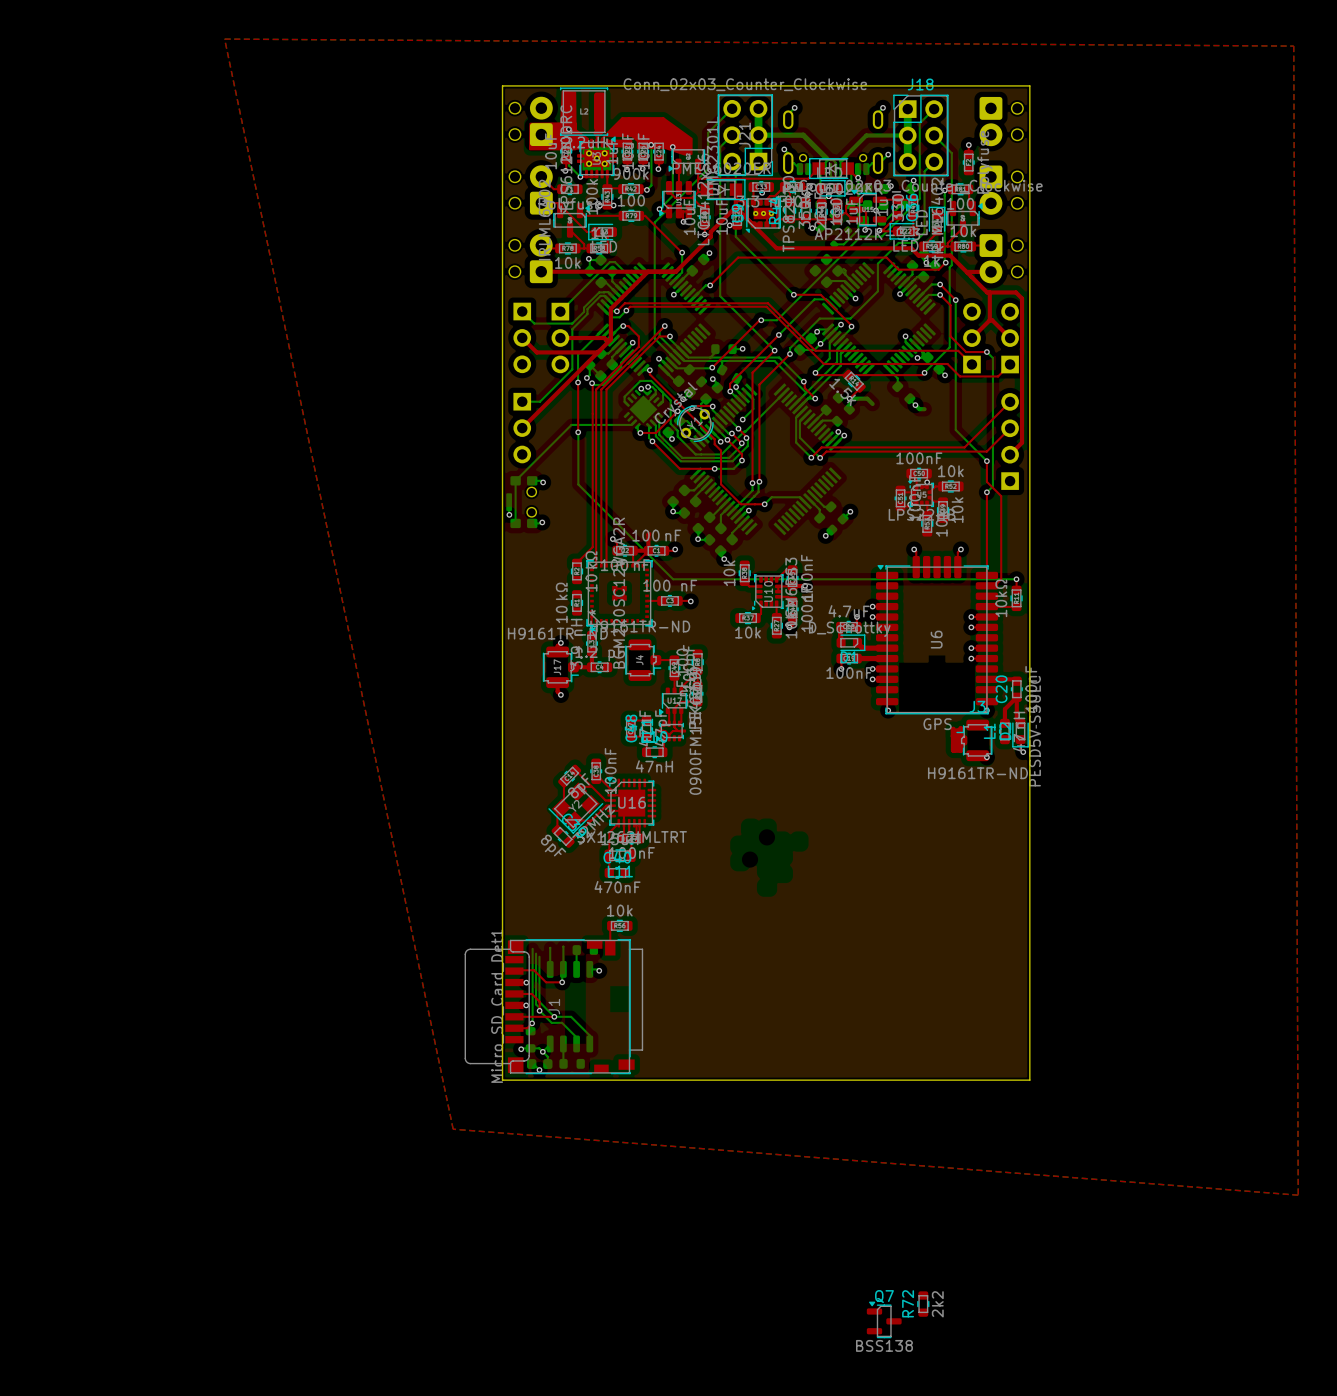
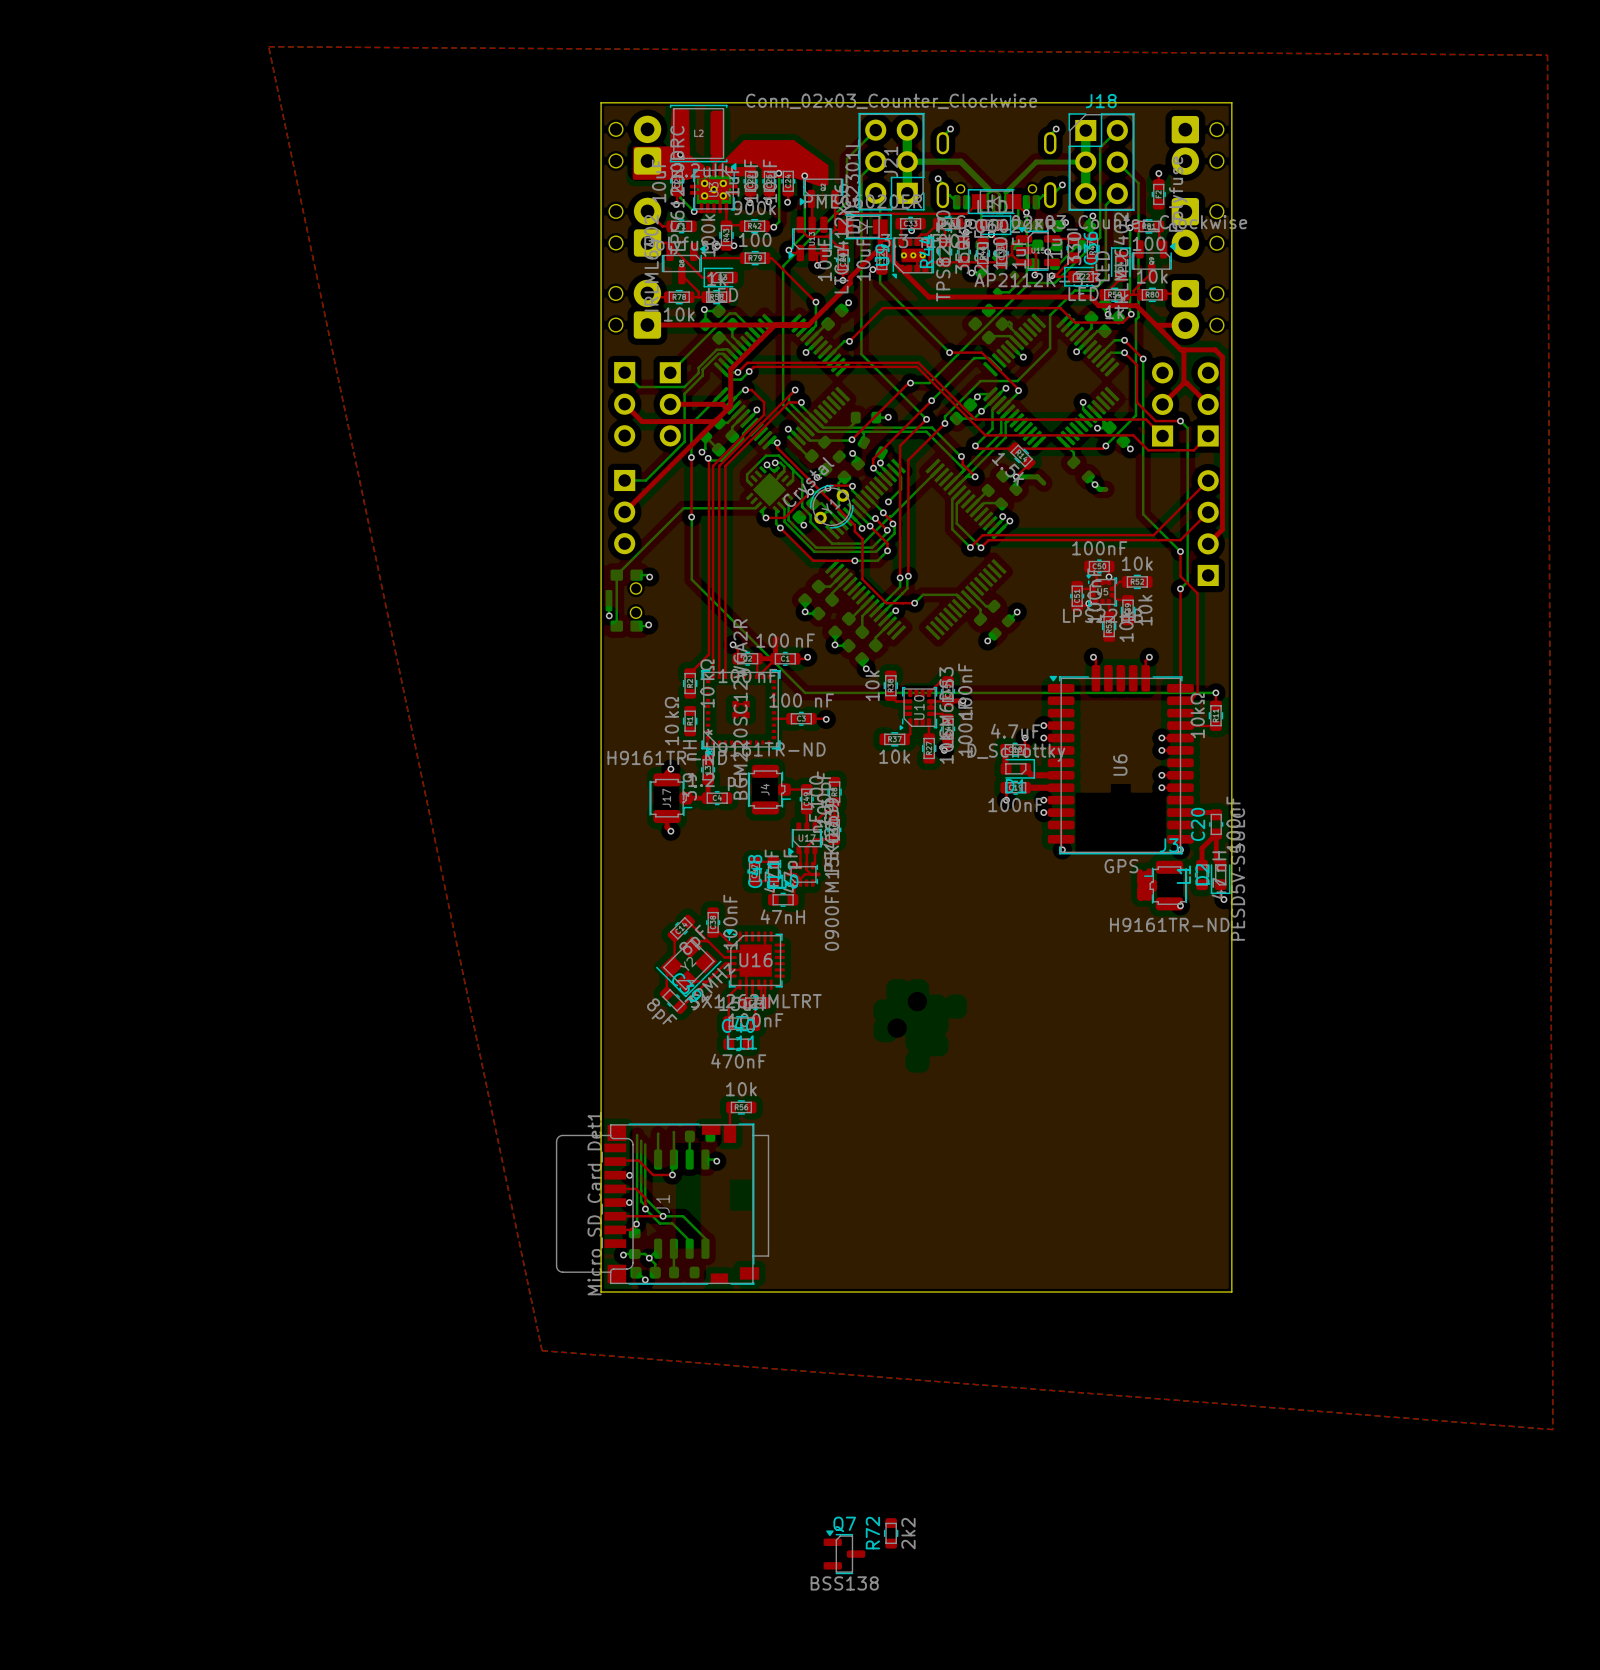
R72 position: (923, 1304) -> (891, 1533)
Q7 position: (884, 1319) -> (844, 1552)

